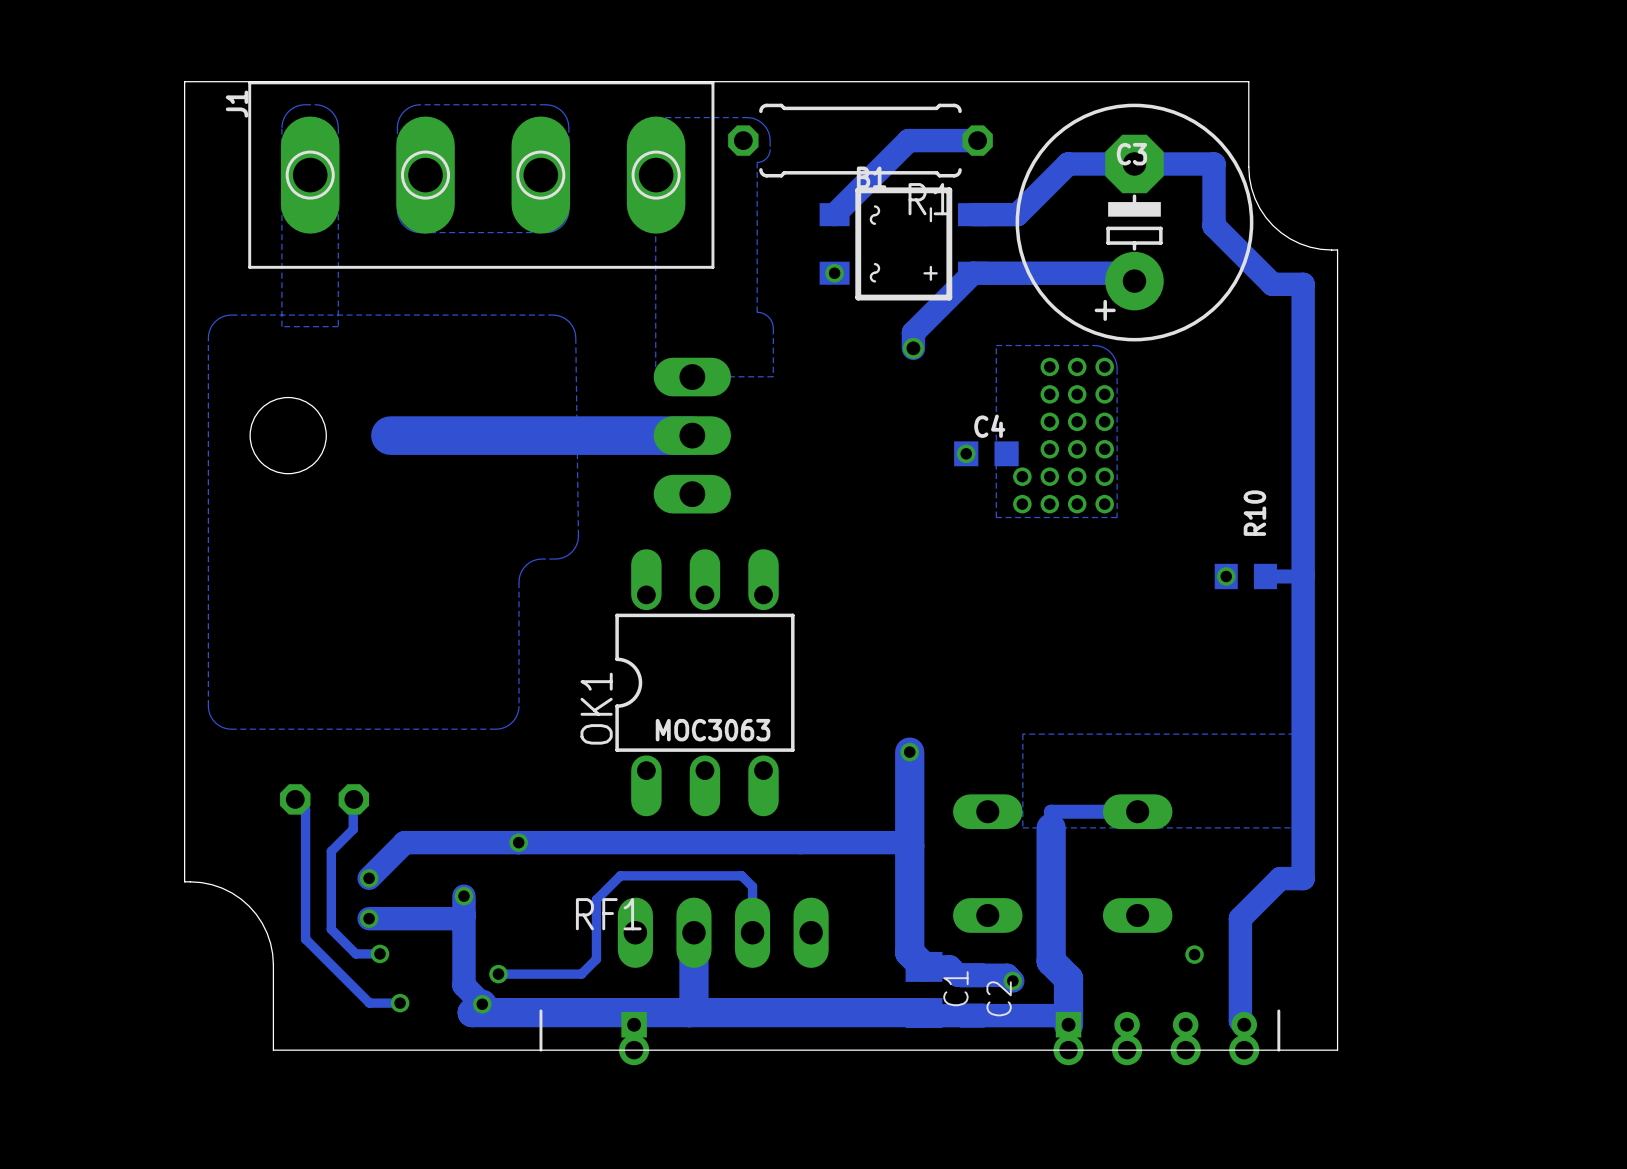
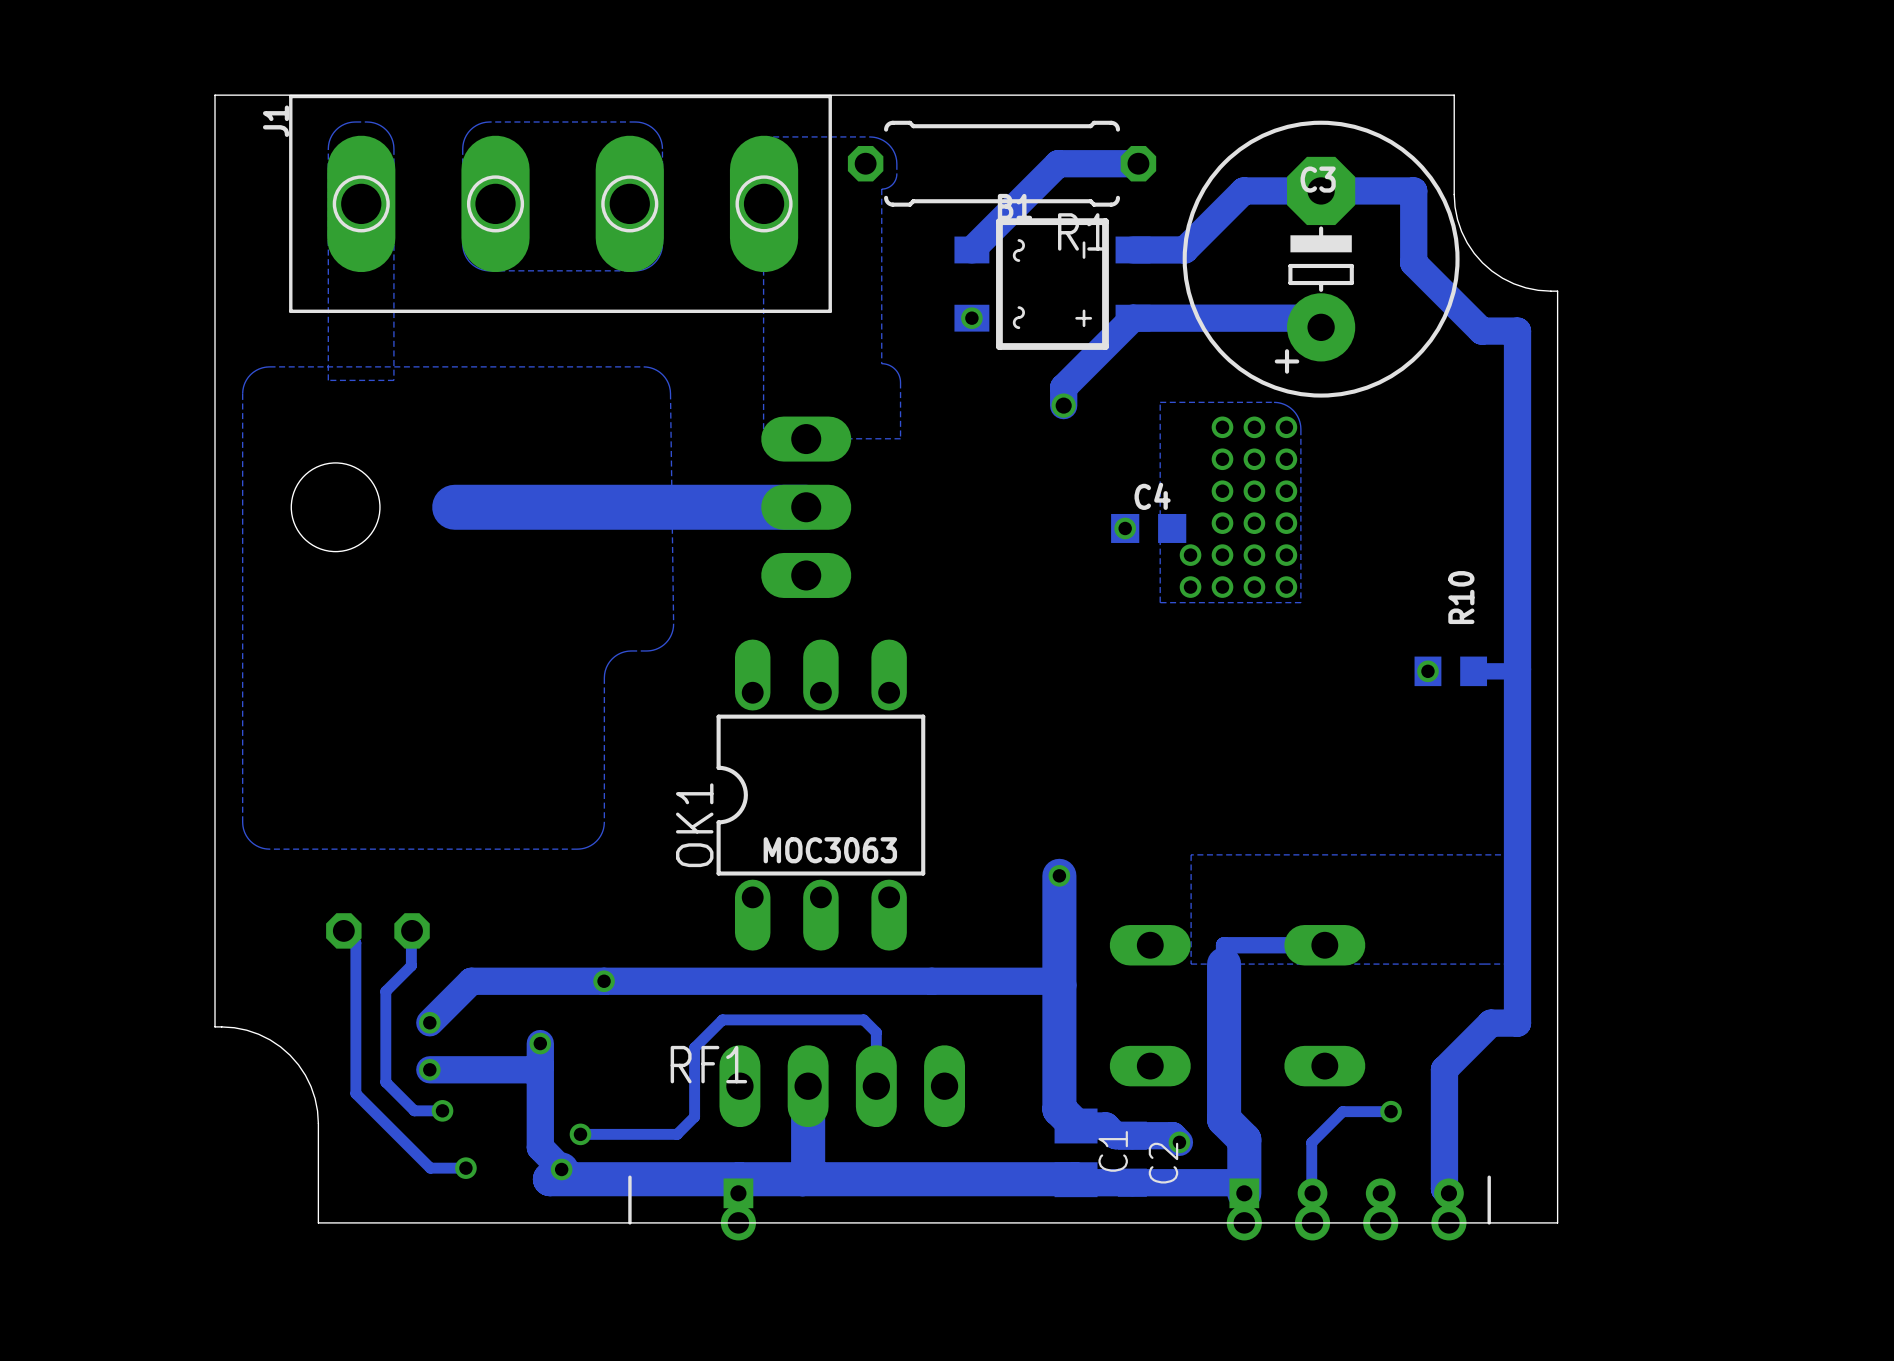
track: none -> (1391, 1111) (1342, 1111) (1311, 1142) (1312, 1193)

